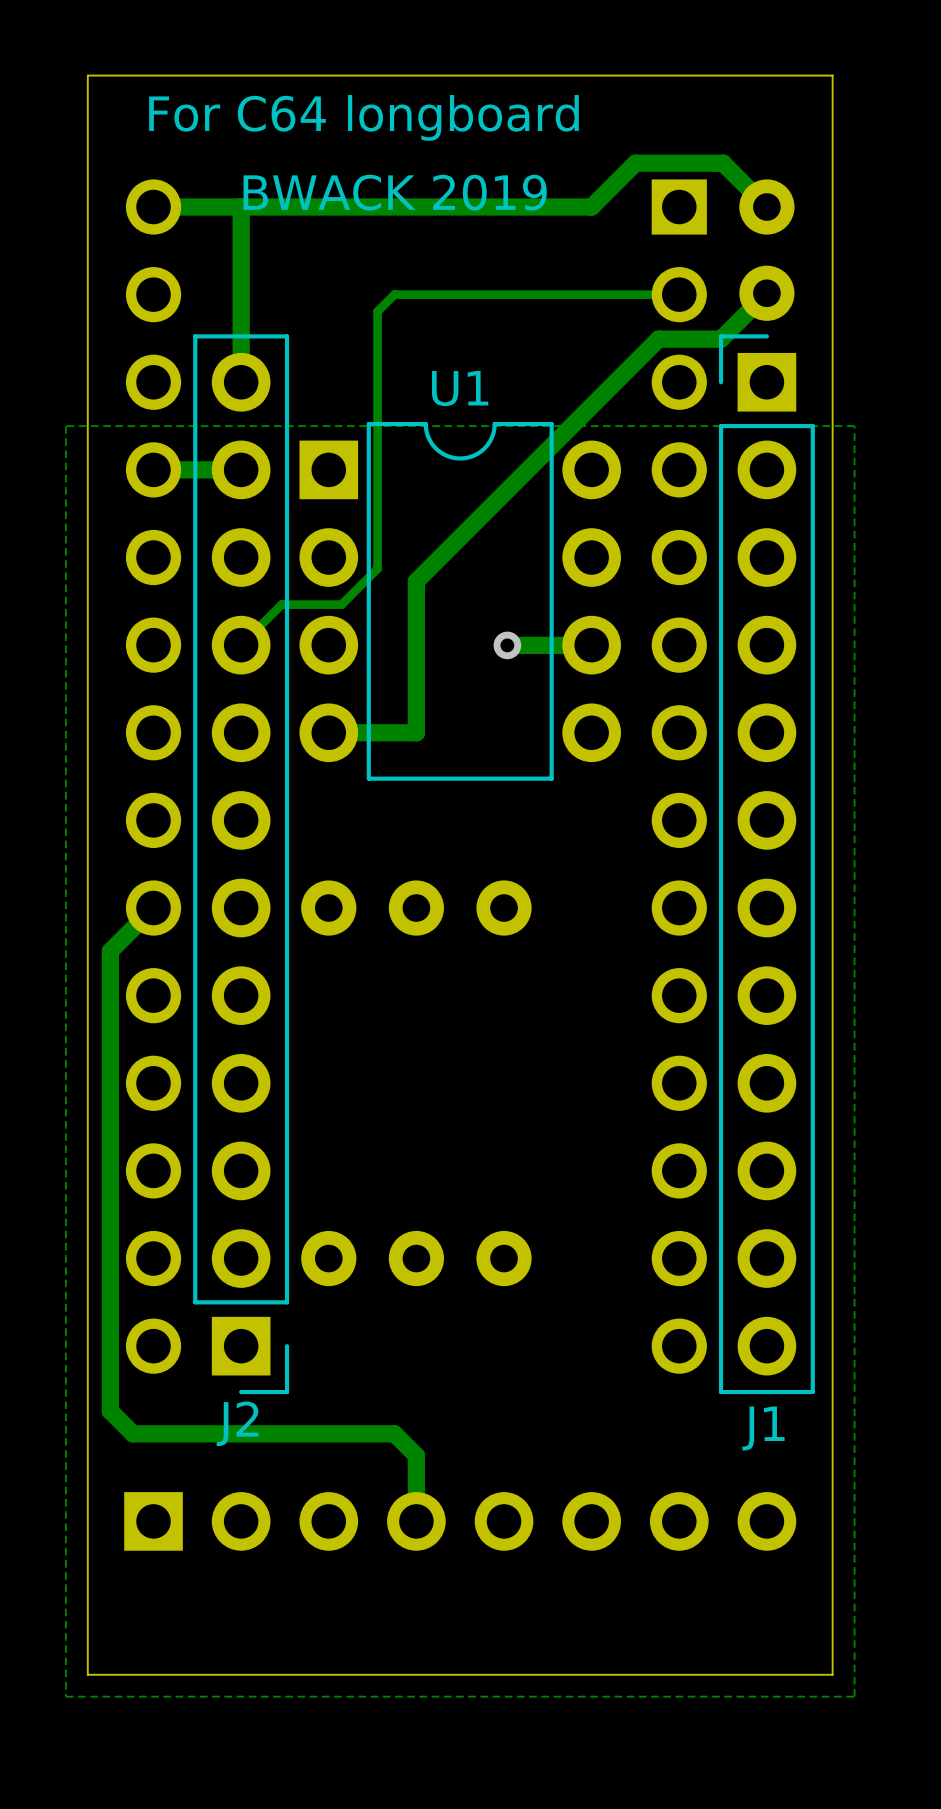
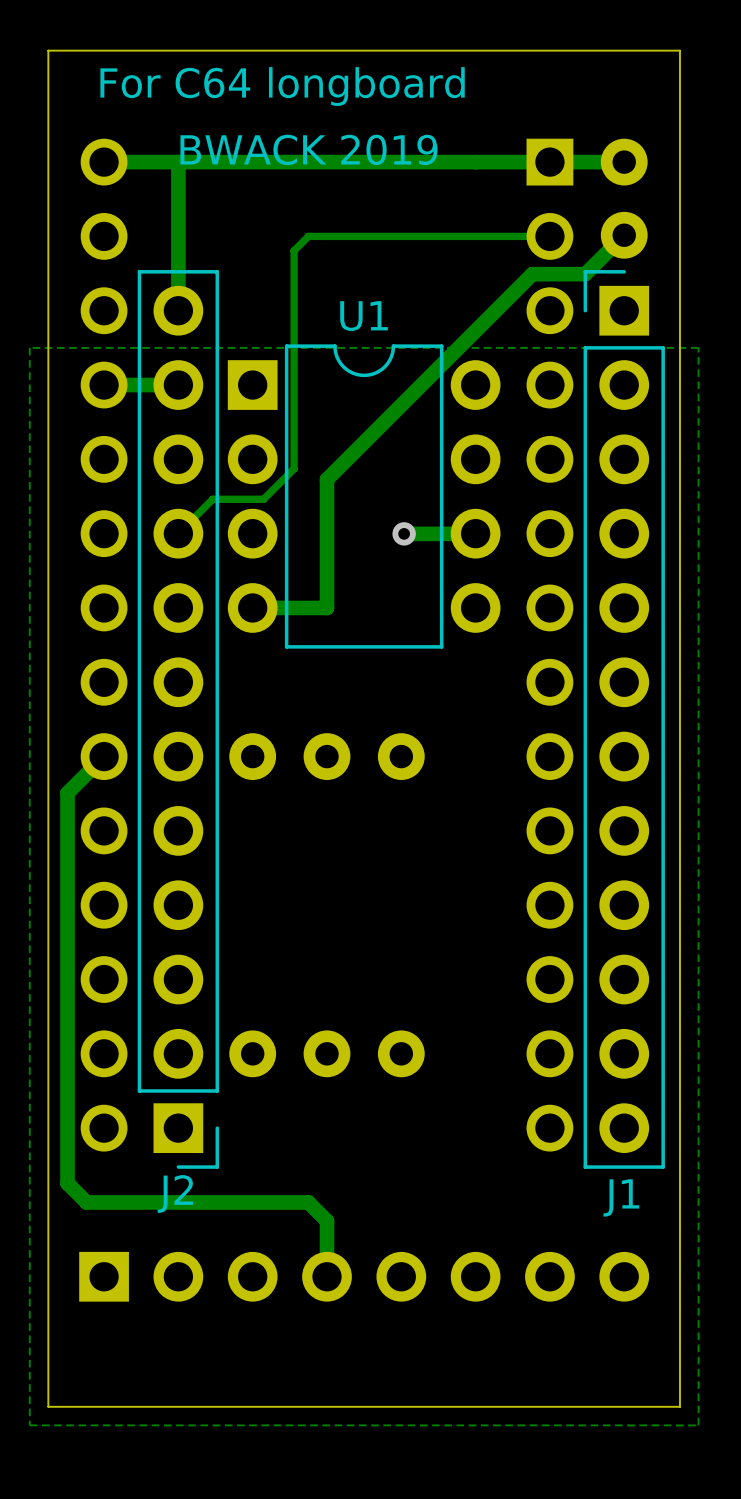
track: (766, 207) (723, 163) (635, 163) (591, 207) -> (624, 162) (475, 162)

